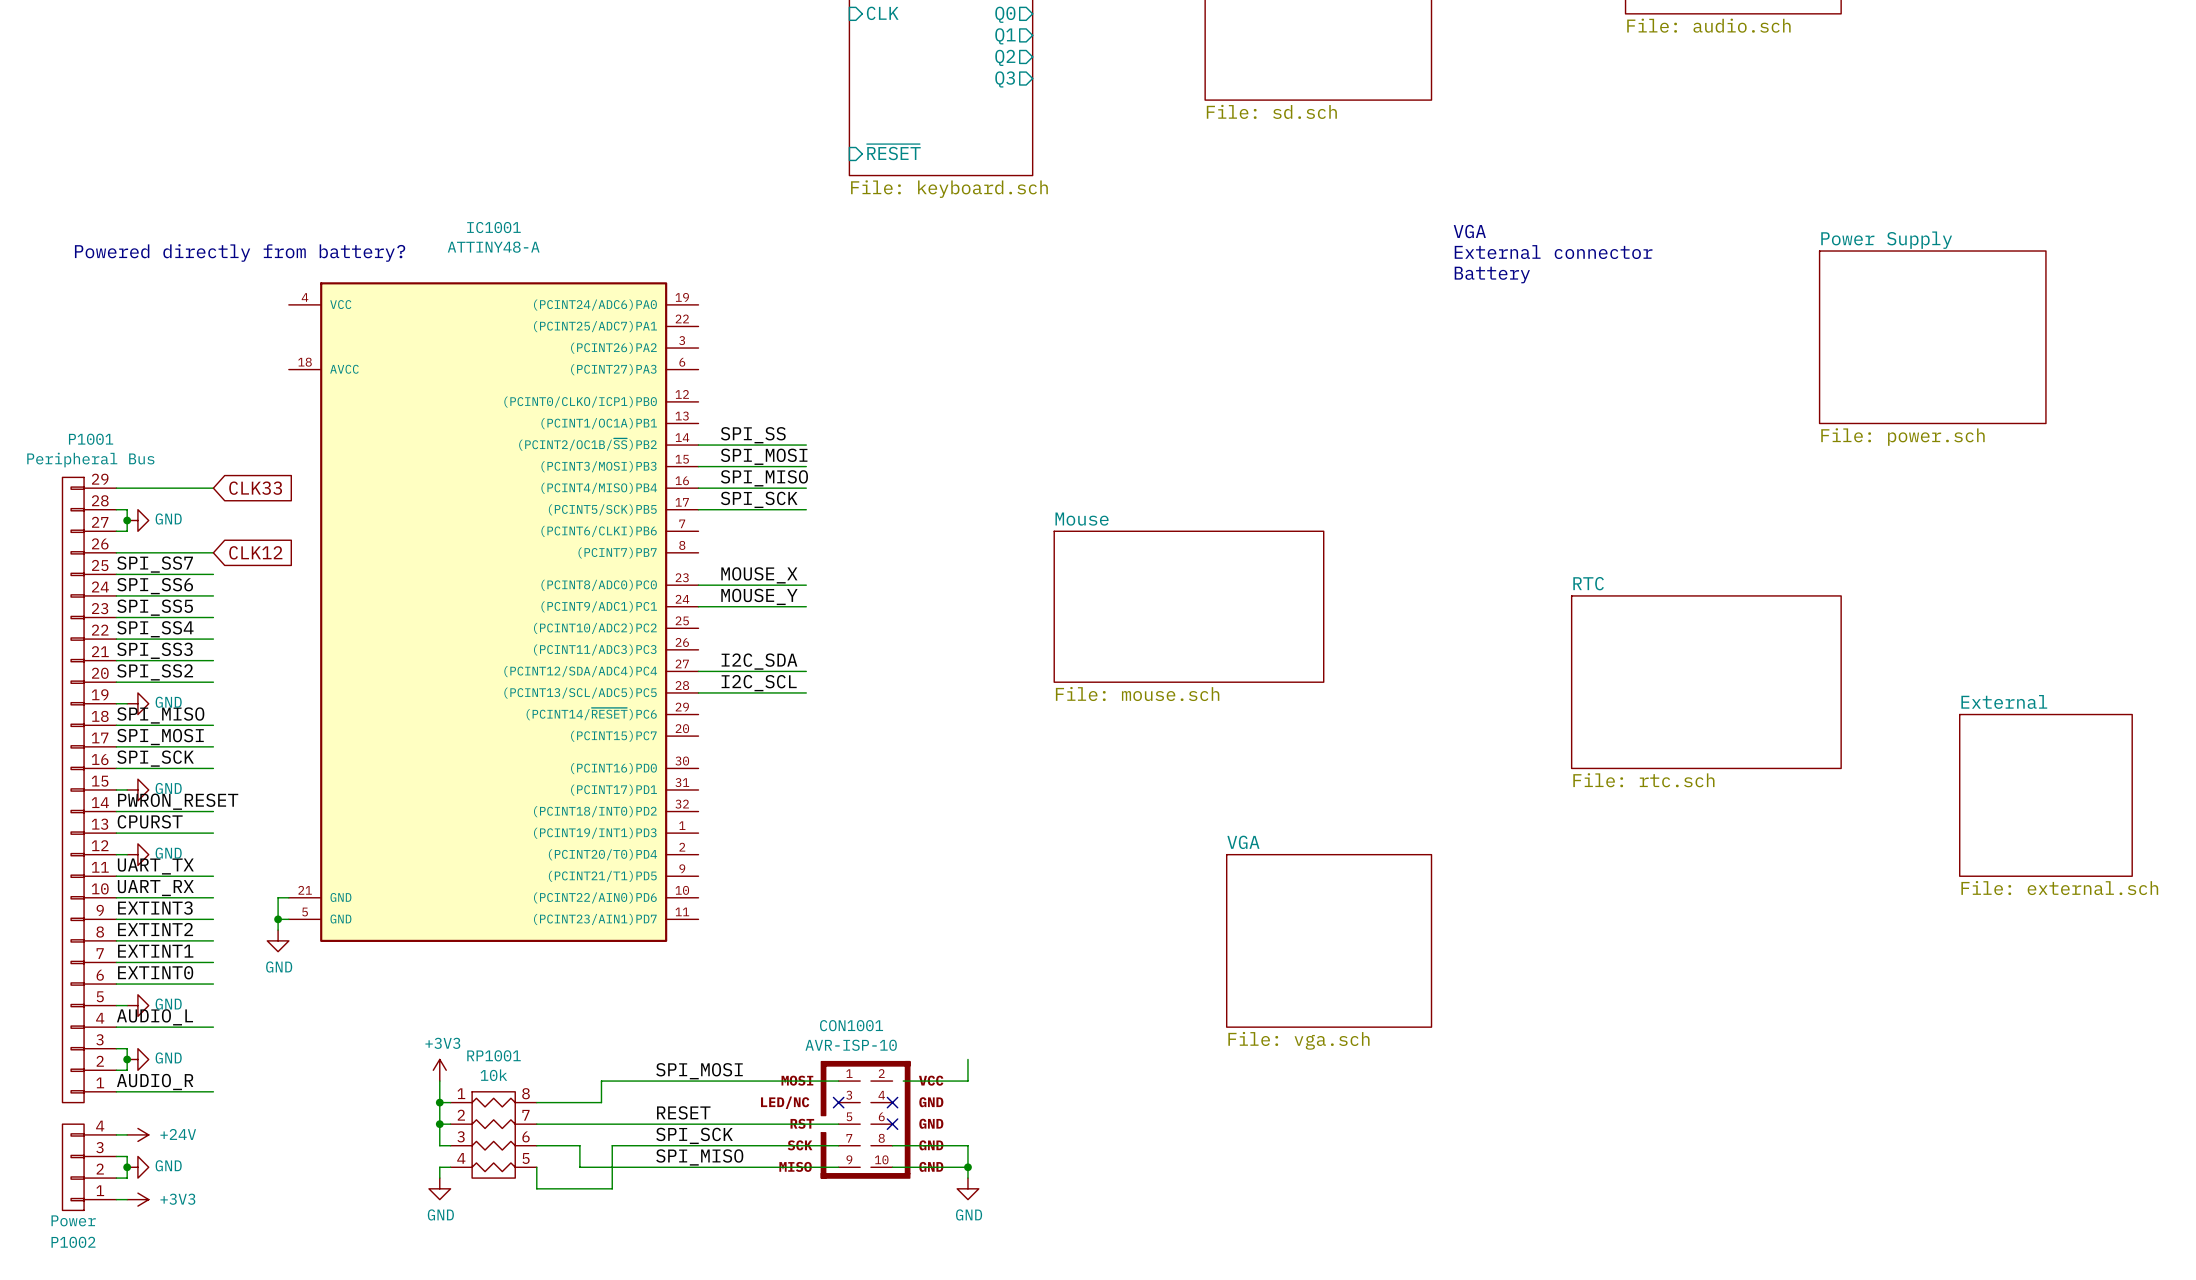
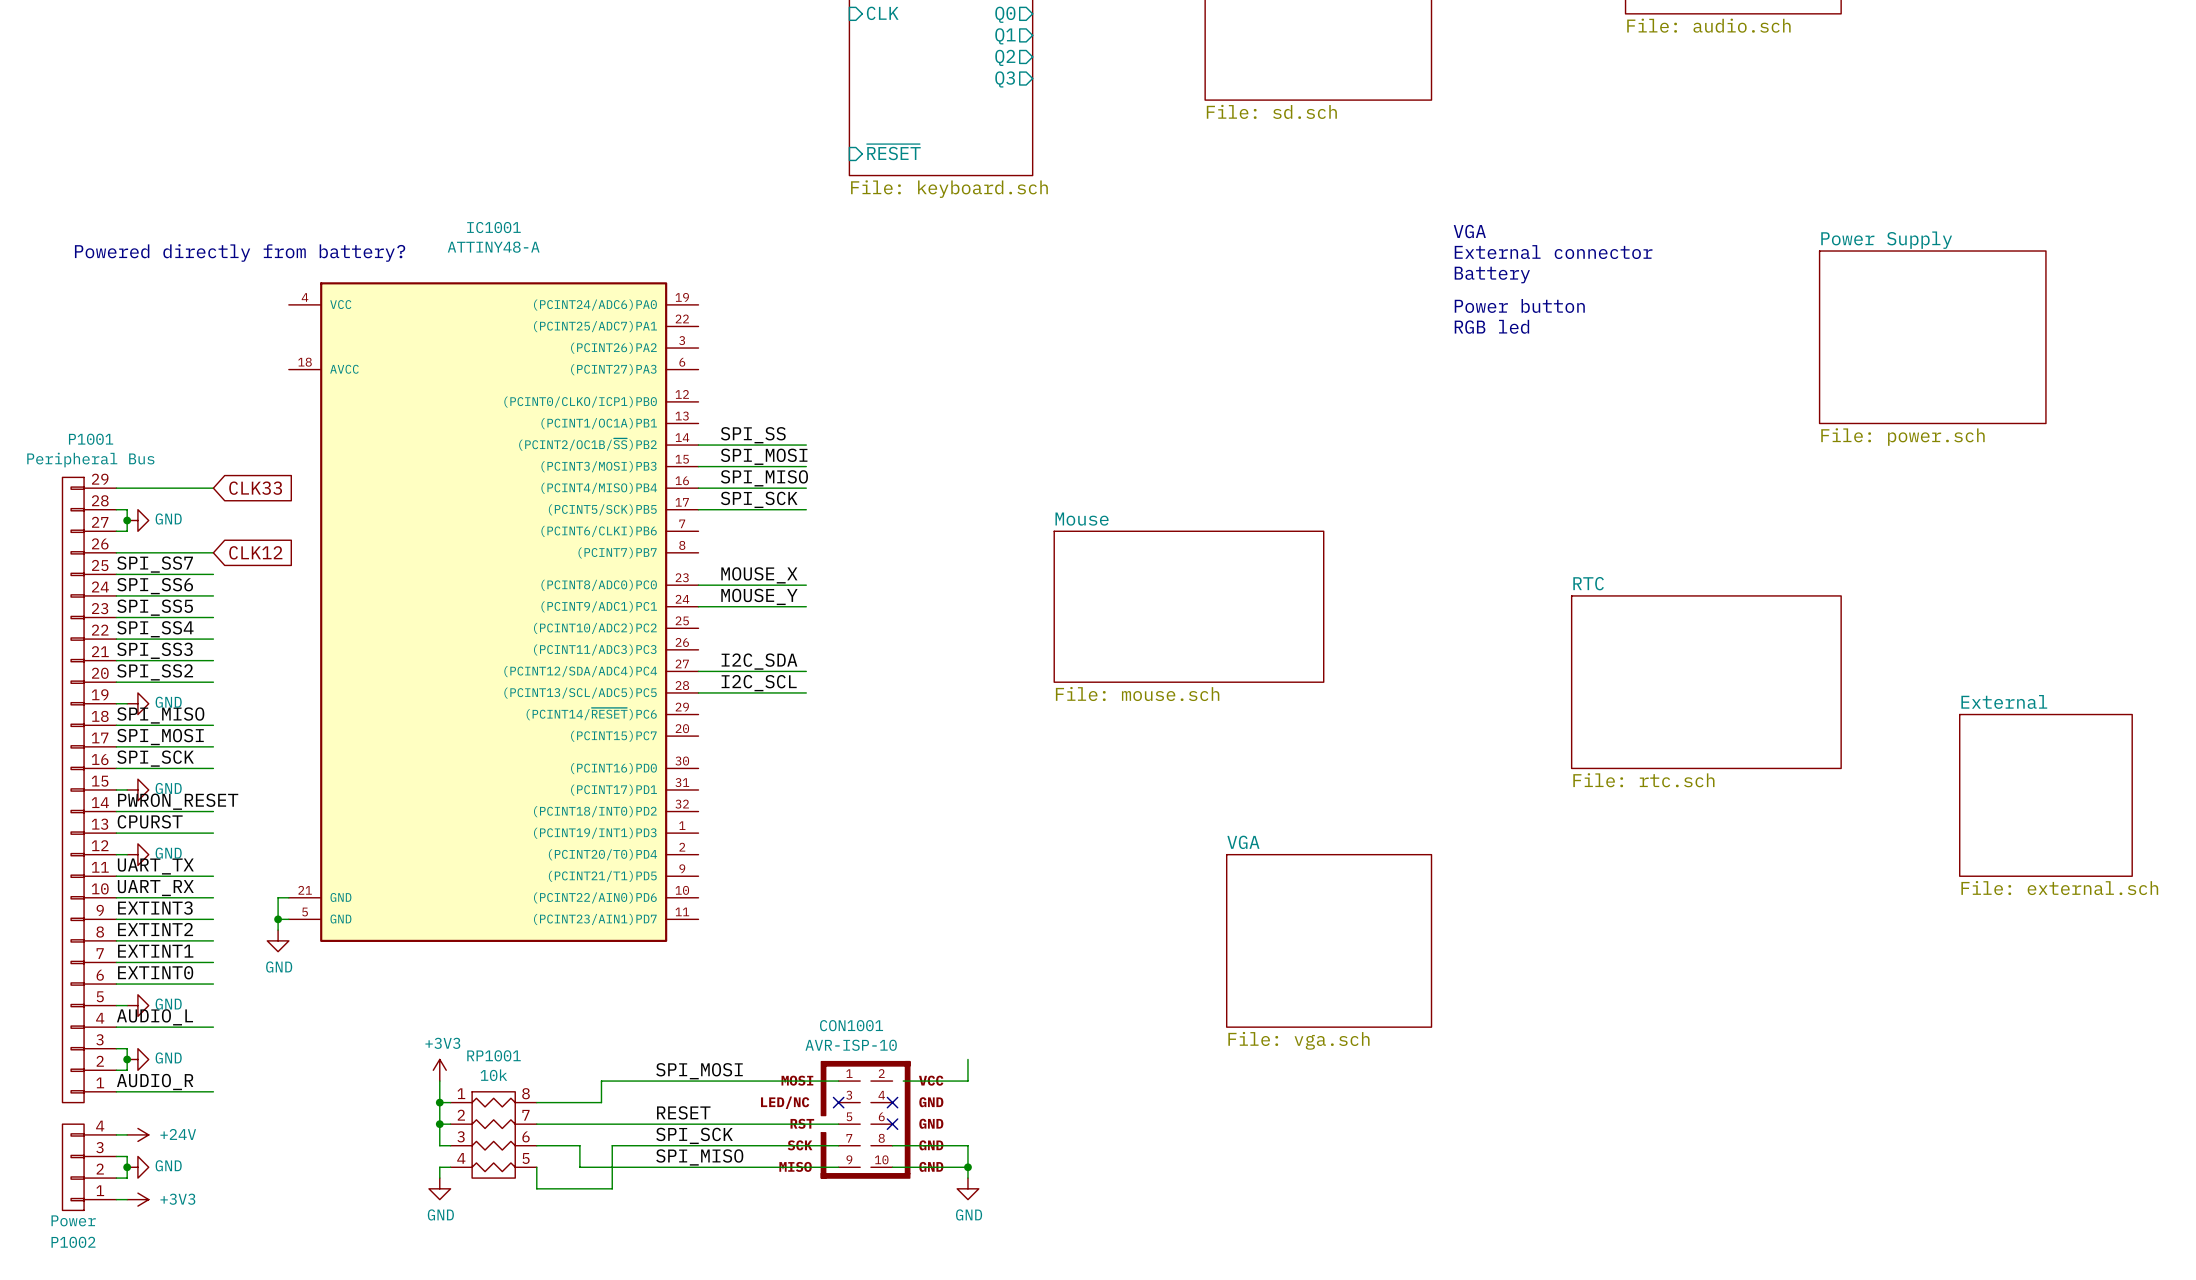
text: none -> Power button (1519, 305)
text: none -> RGB led (1491, 326)

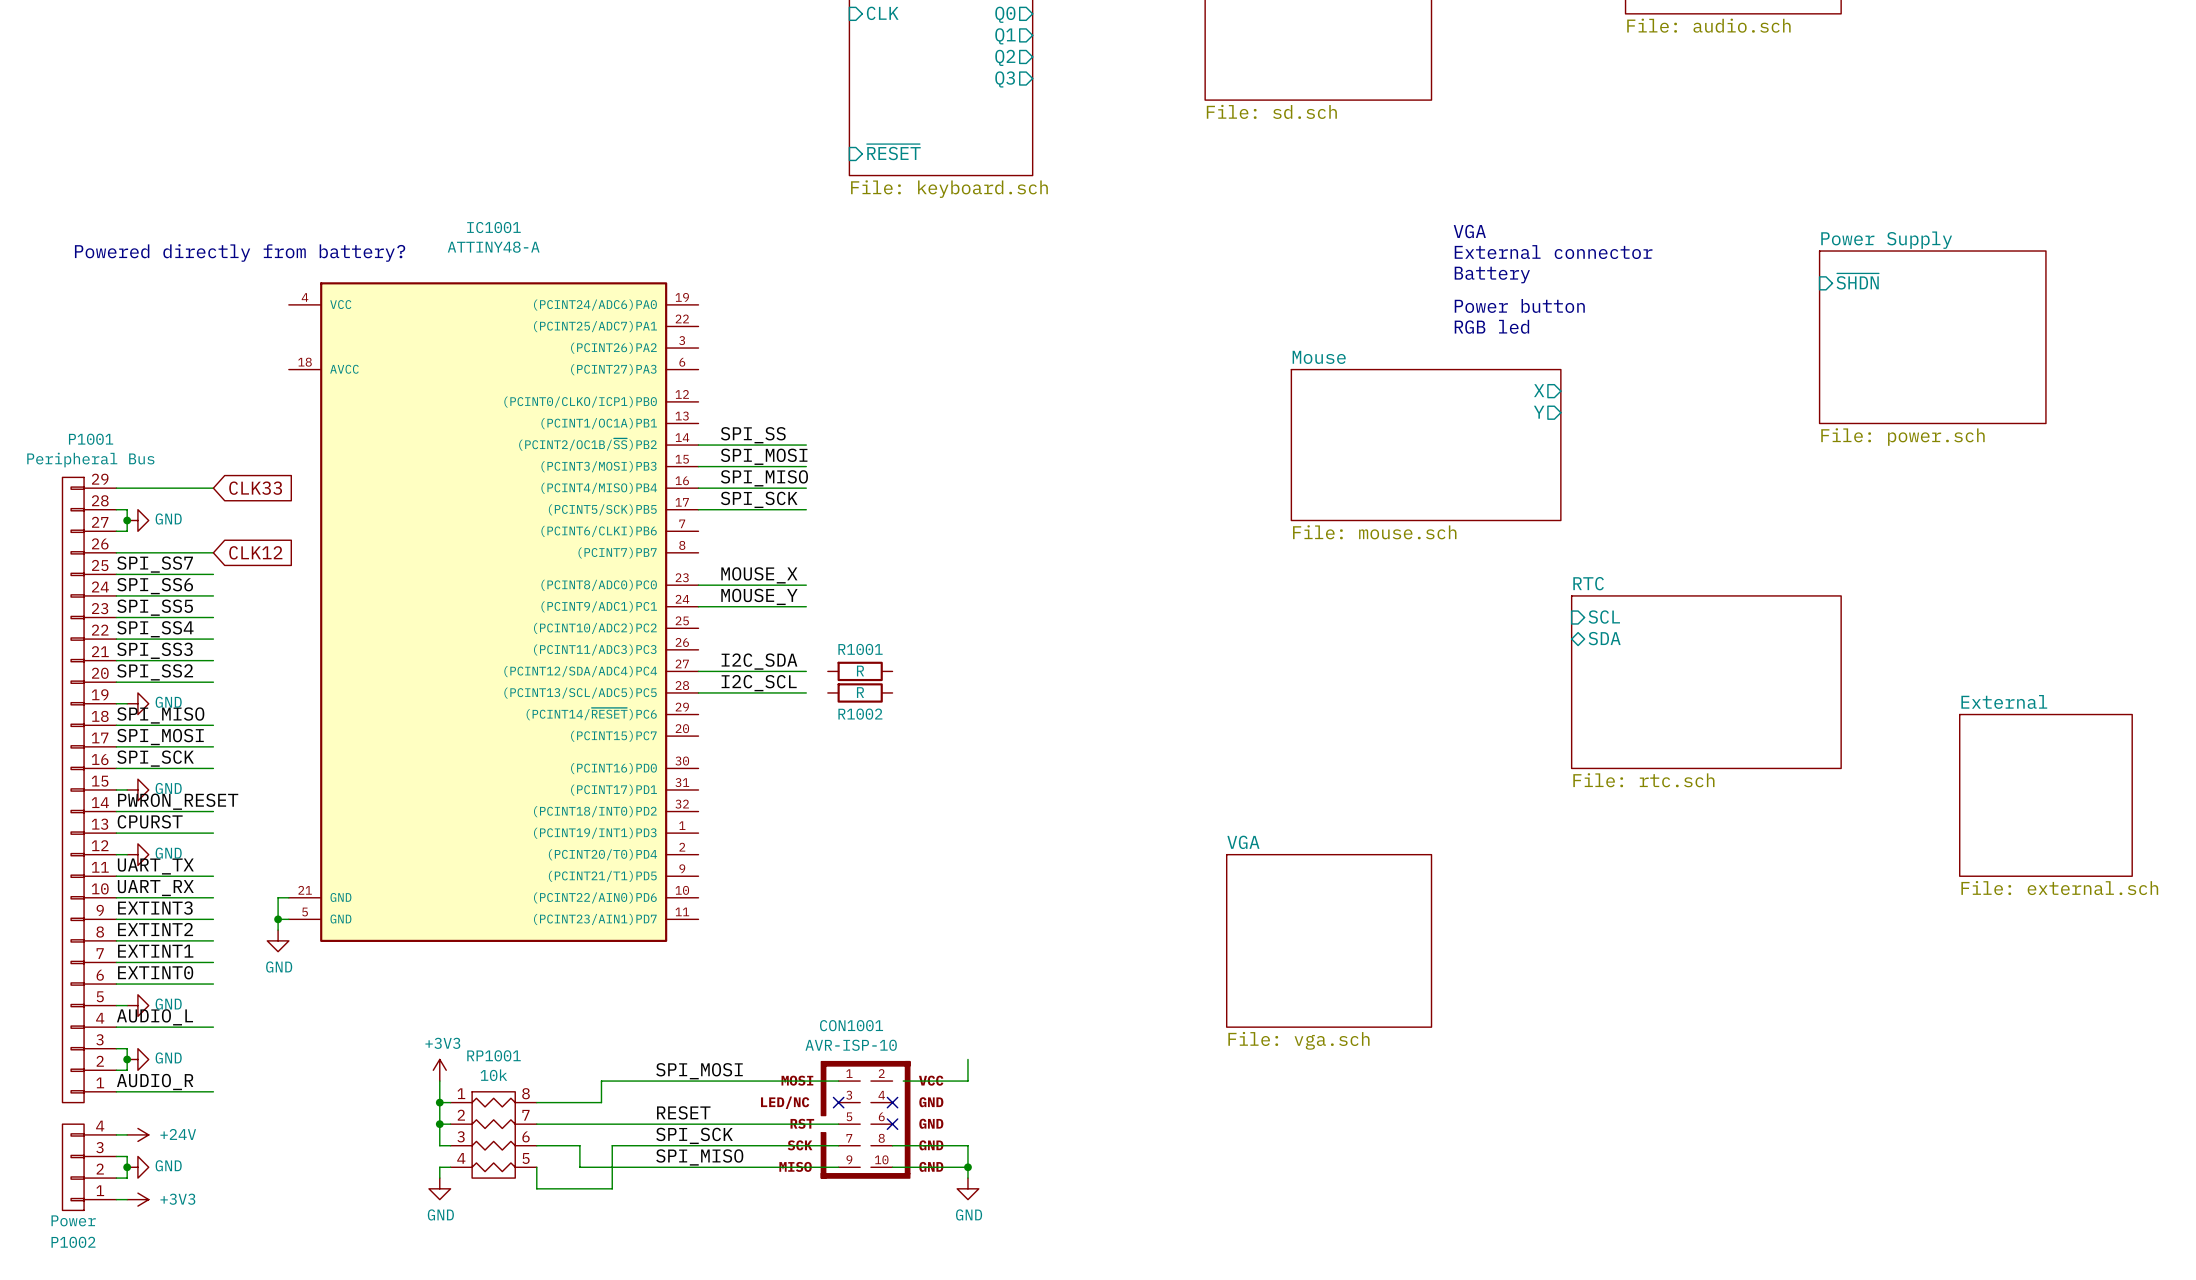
sheet pin: none -> ~{SHDN} (1857, 281)
sheet pin: none -> X (1539, 390)
sheet pin: none -> Y (1539, 412)
sheet Mouse: none -> File: mouse.sch (1426, 445)
sheet Mouse: File: mouse.sch (1188, 606) -> none
sheet pin: none -> SCL (1604, 617)
sheet pin: none -> SDA (1604, 638)
R1001: none -> R (860, 671)
R1002: none -> R (860, 692)

